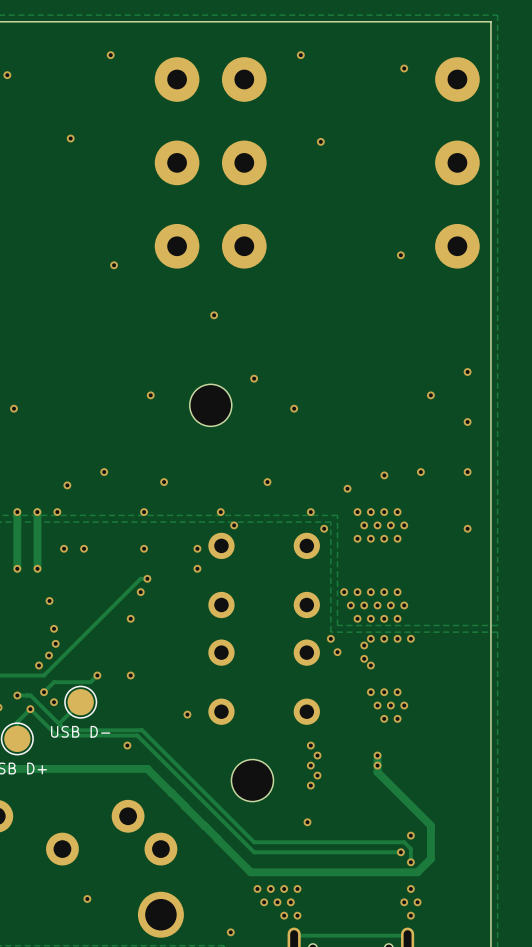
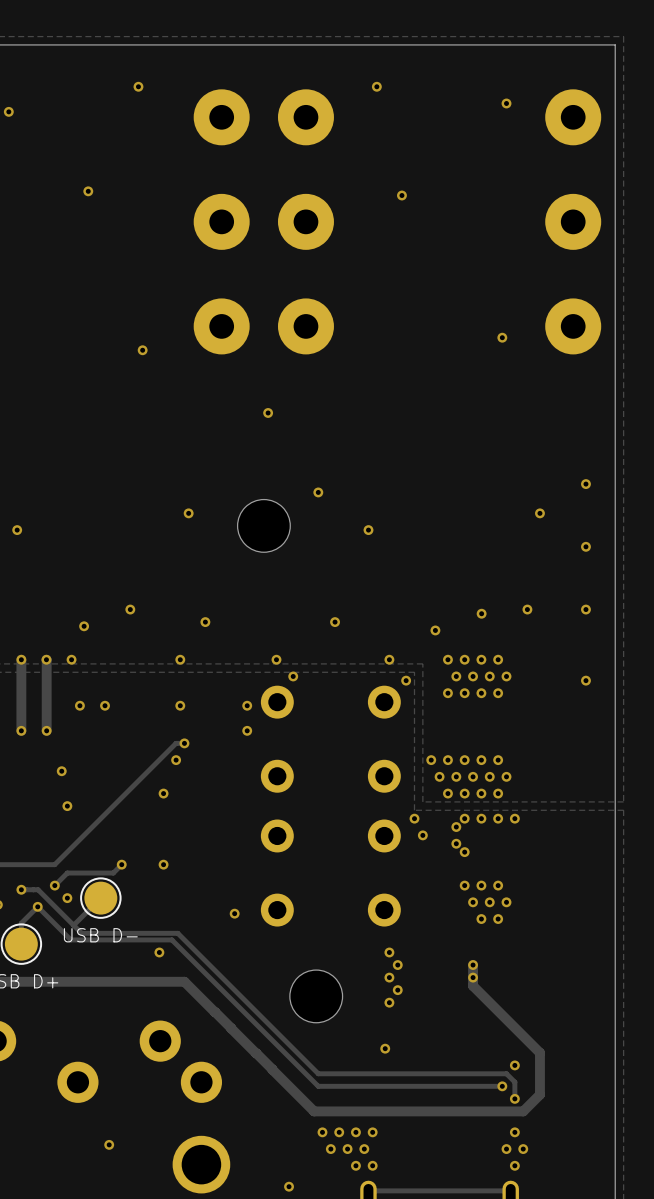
via: (55, 643) -> none
via: (49, 655) -> none
via: (39, 665) -> none

